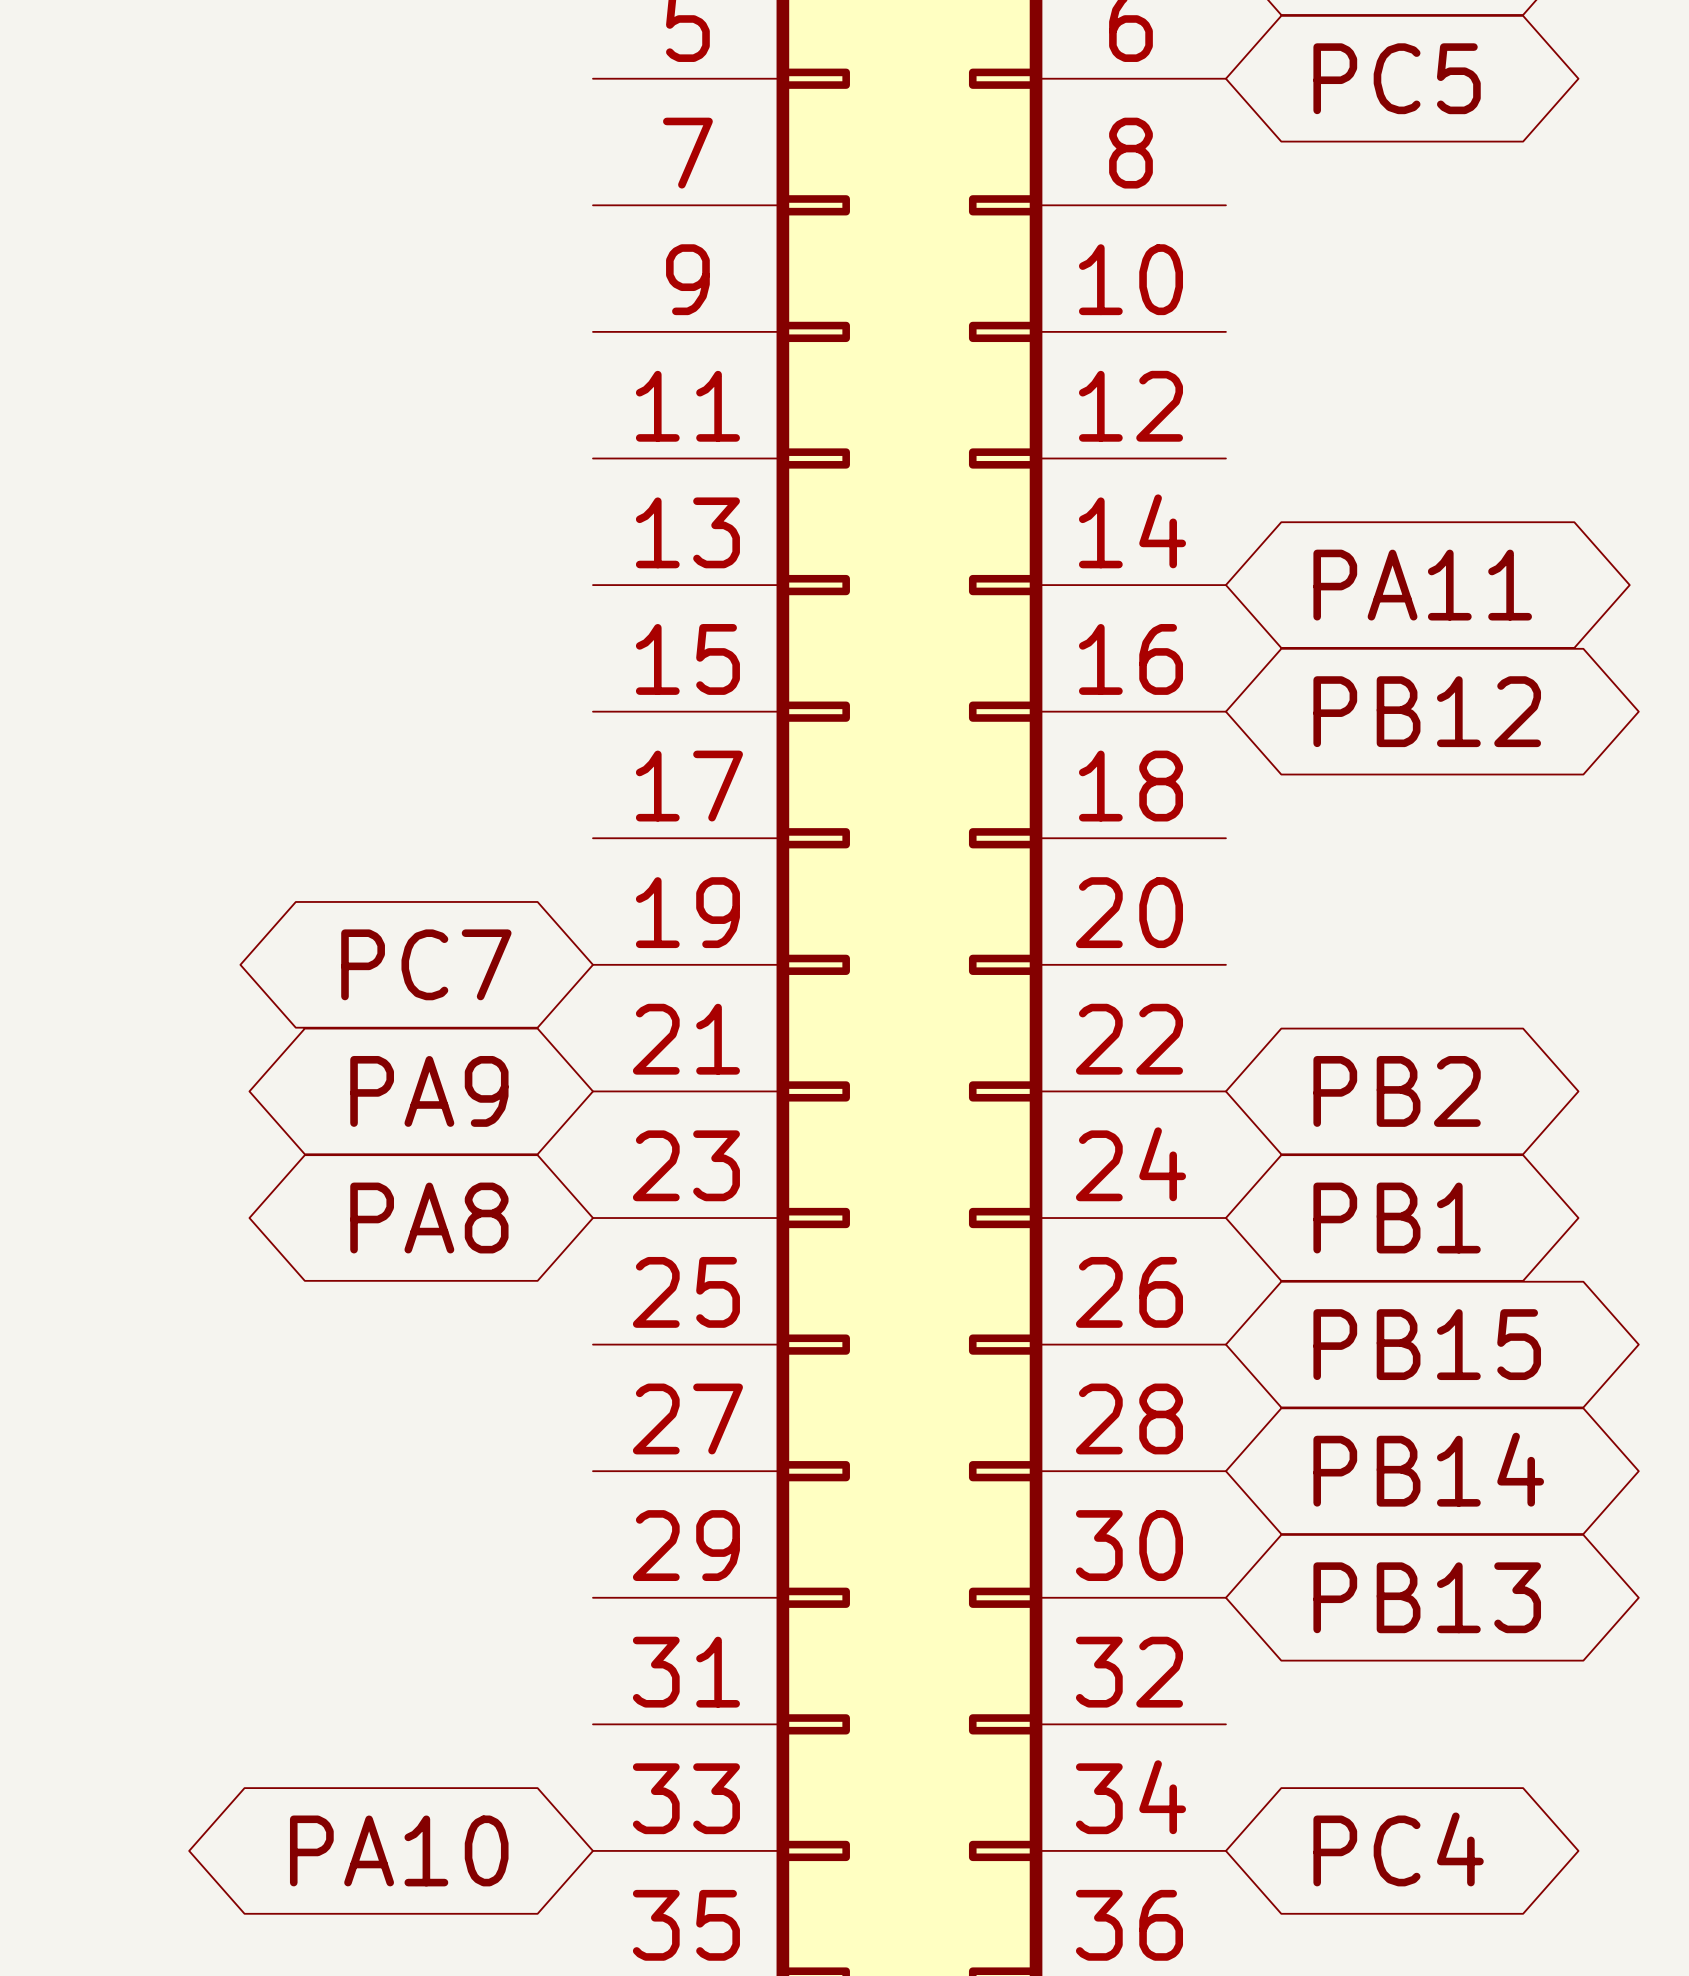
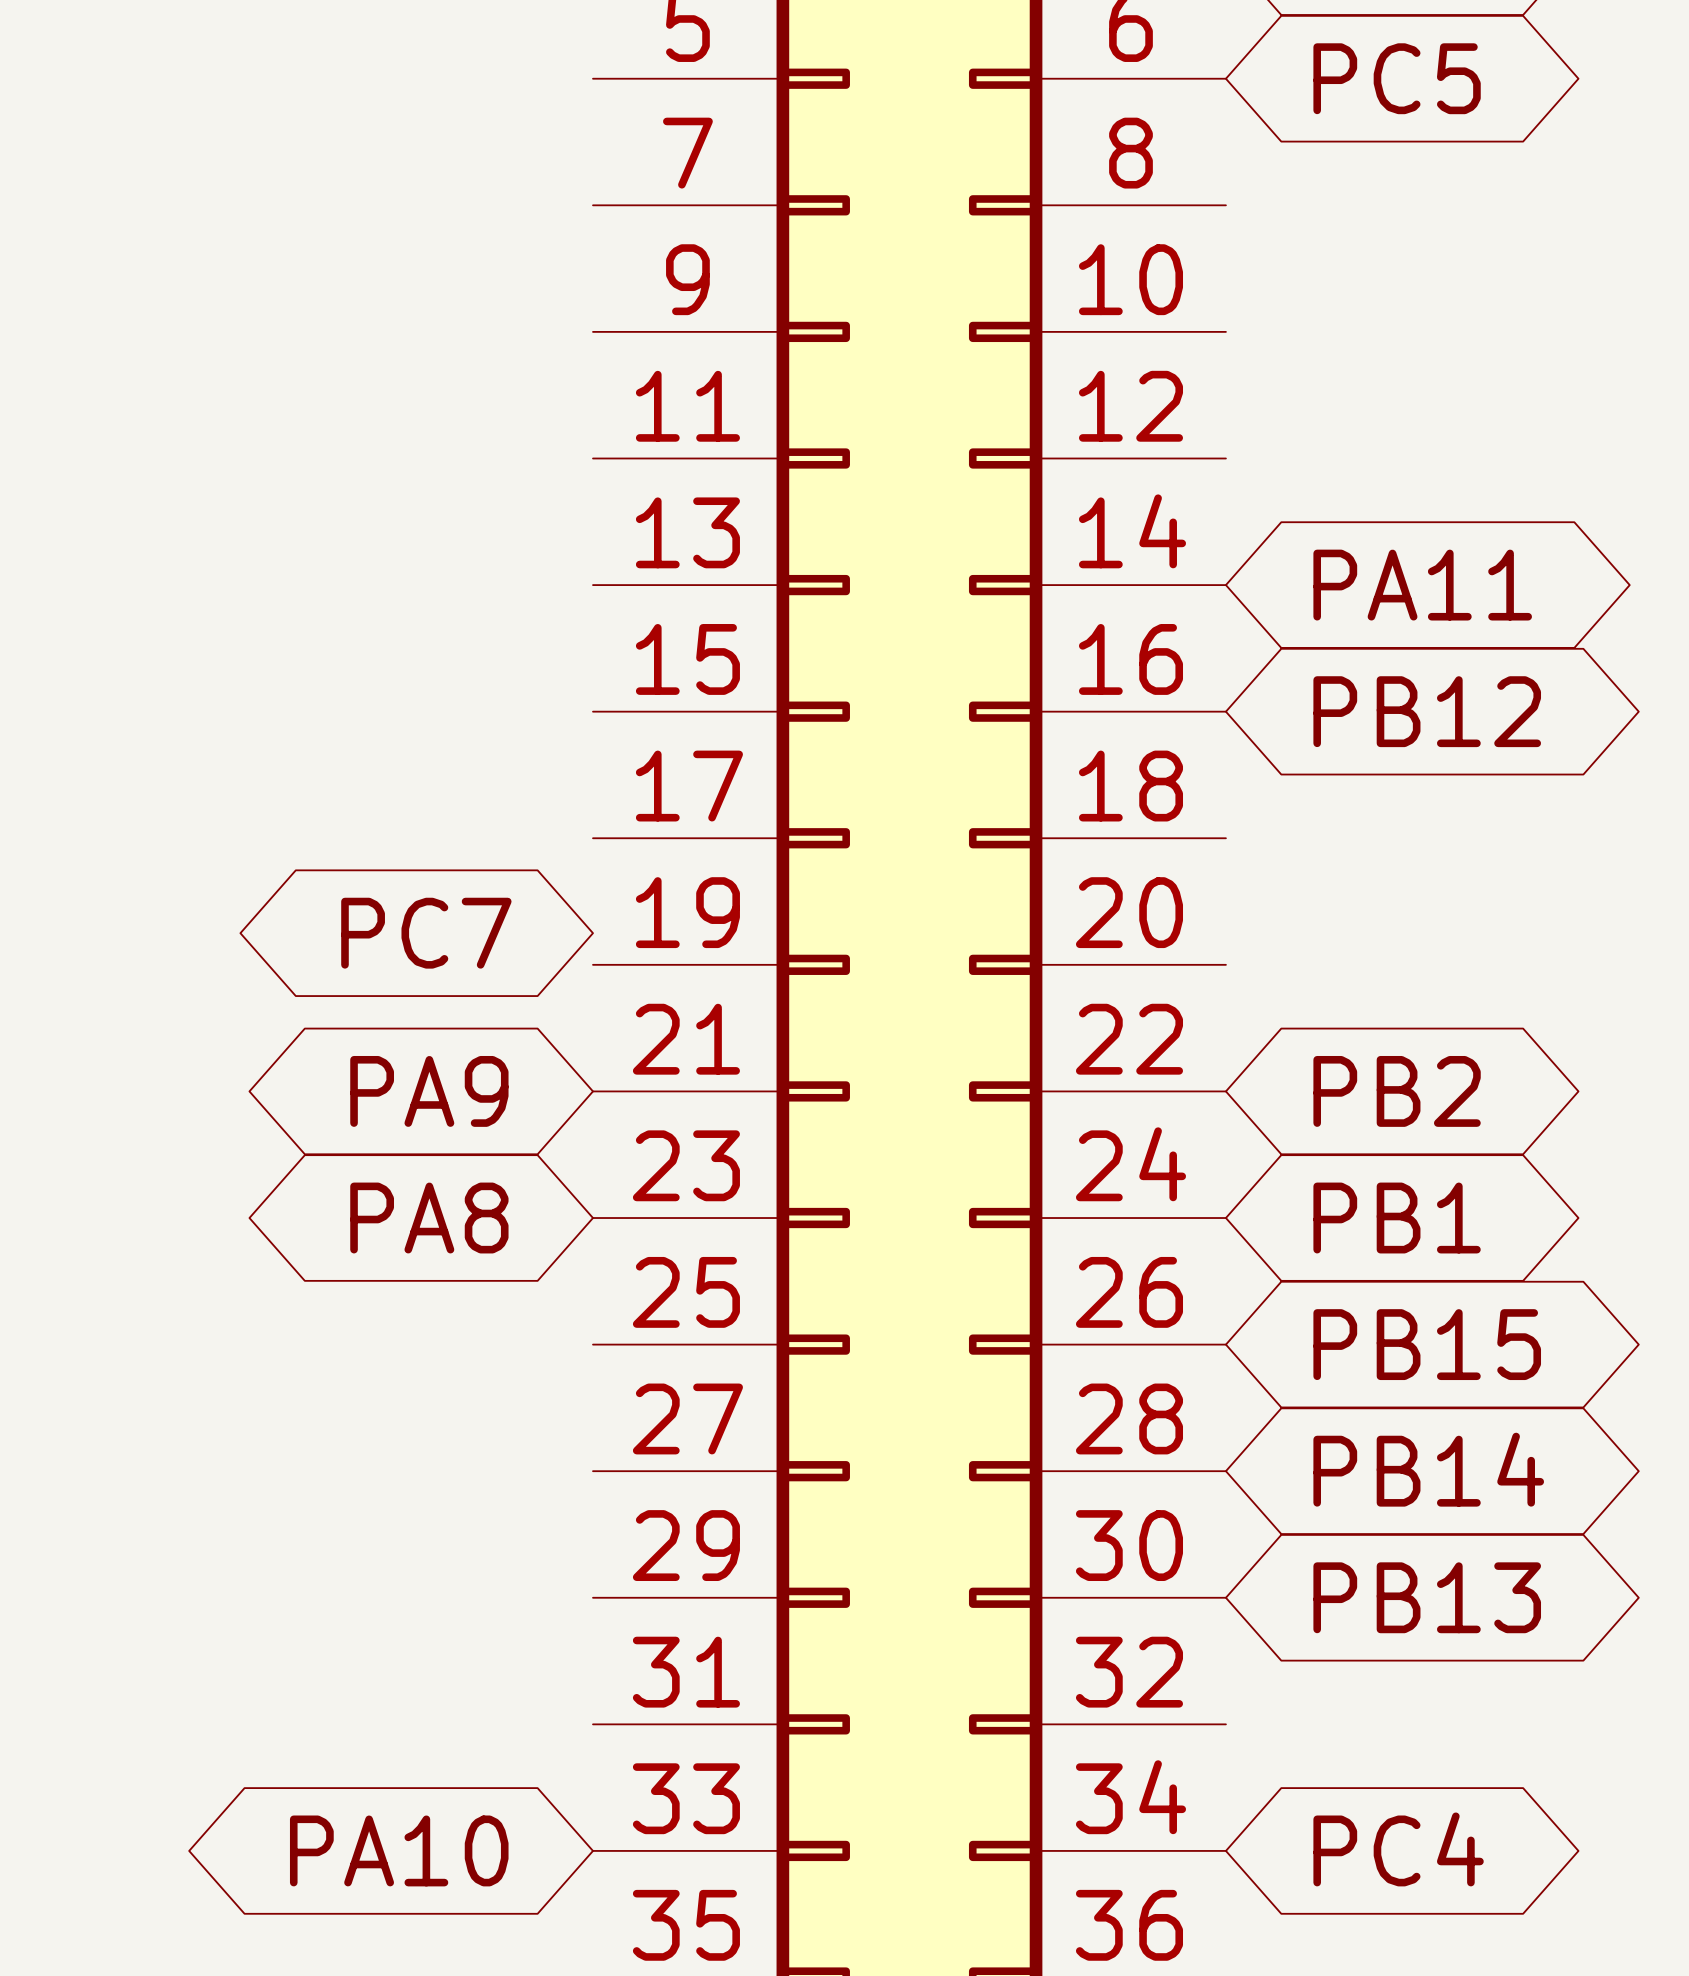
global label position: PC7 (426, 964) -> PC7 (426, 933)

